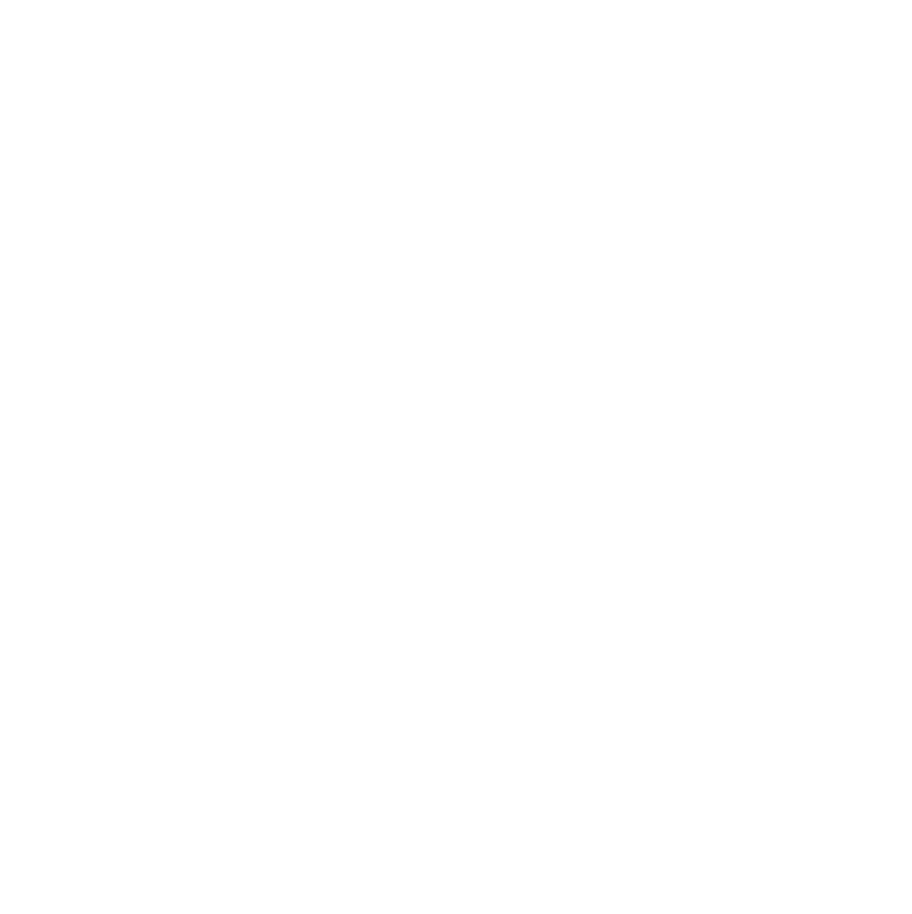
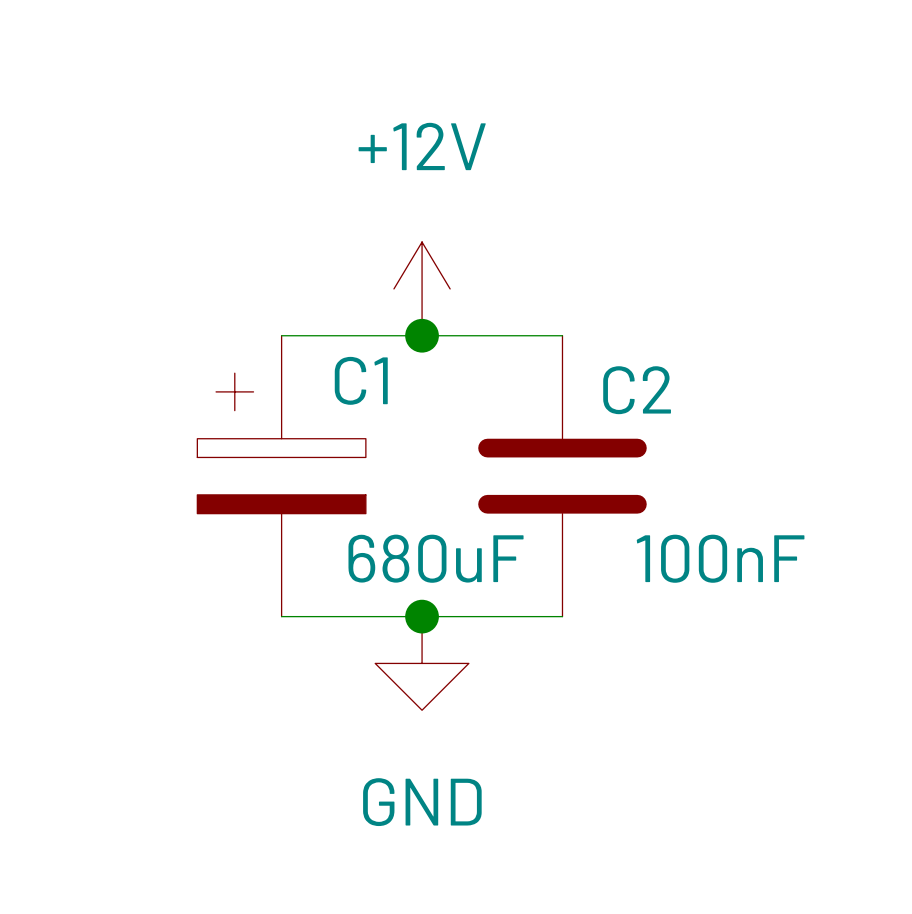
power symbol: none -> +12V (422, 288)
wire: none -> (281, 335) (562, 335)
junction: none -> (422, 335)
C1: none -> 680uF (281, 476)
C2: none -> 100nF (562, 476)
wire: none -> (281, 616) (562, 616)
junction: none -> (422, 616)
power symbol: none -> GND (422, 663)

